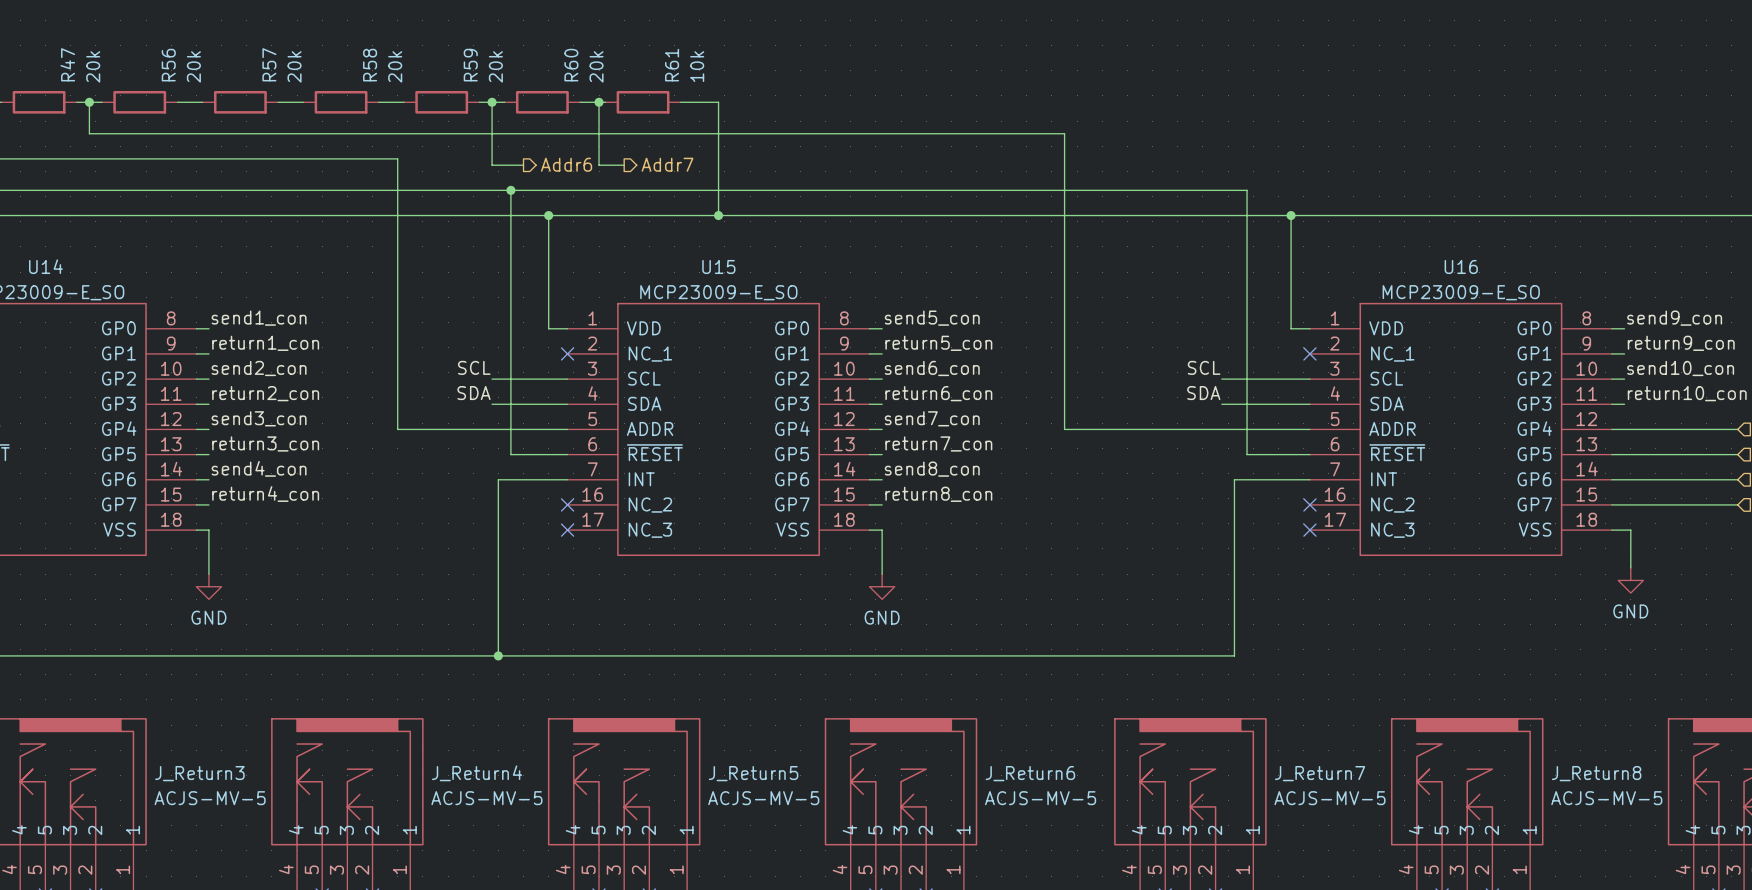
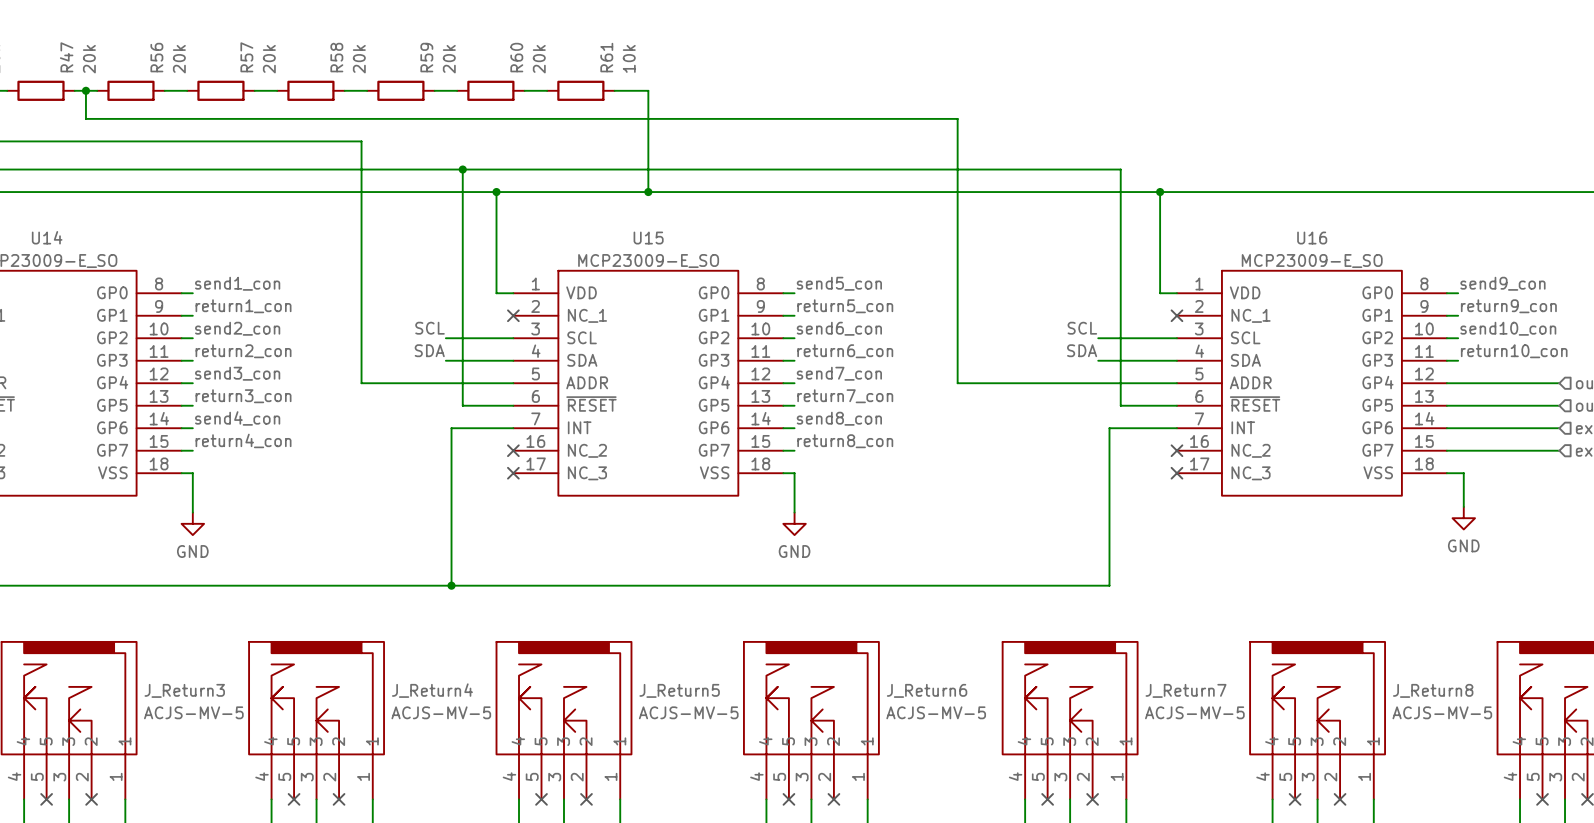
wire: (492, 102) (492, 165) (523, 165) -> none
junction: (492, 102) -> none
wire: (599, 102) (599, 165) (624, 165) -> none
junction: (599, 102) -> none
hierarchical label: Addr6 (566, 164) -> none
hierarchical label: Addr7 (667, 164) -> none

